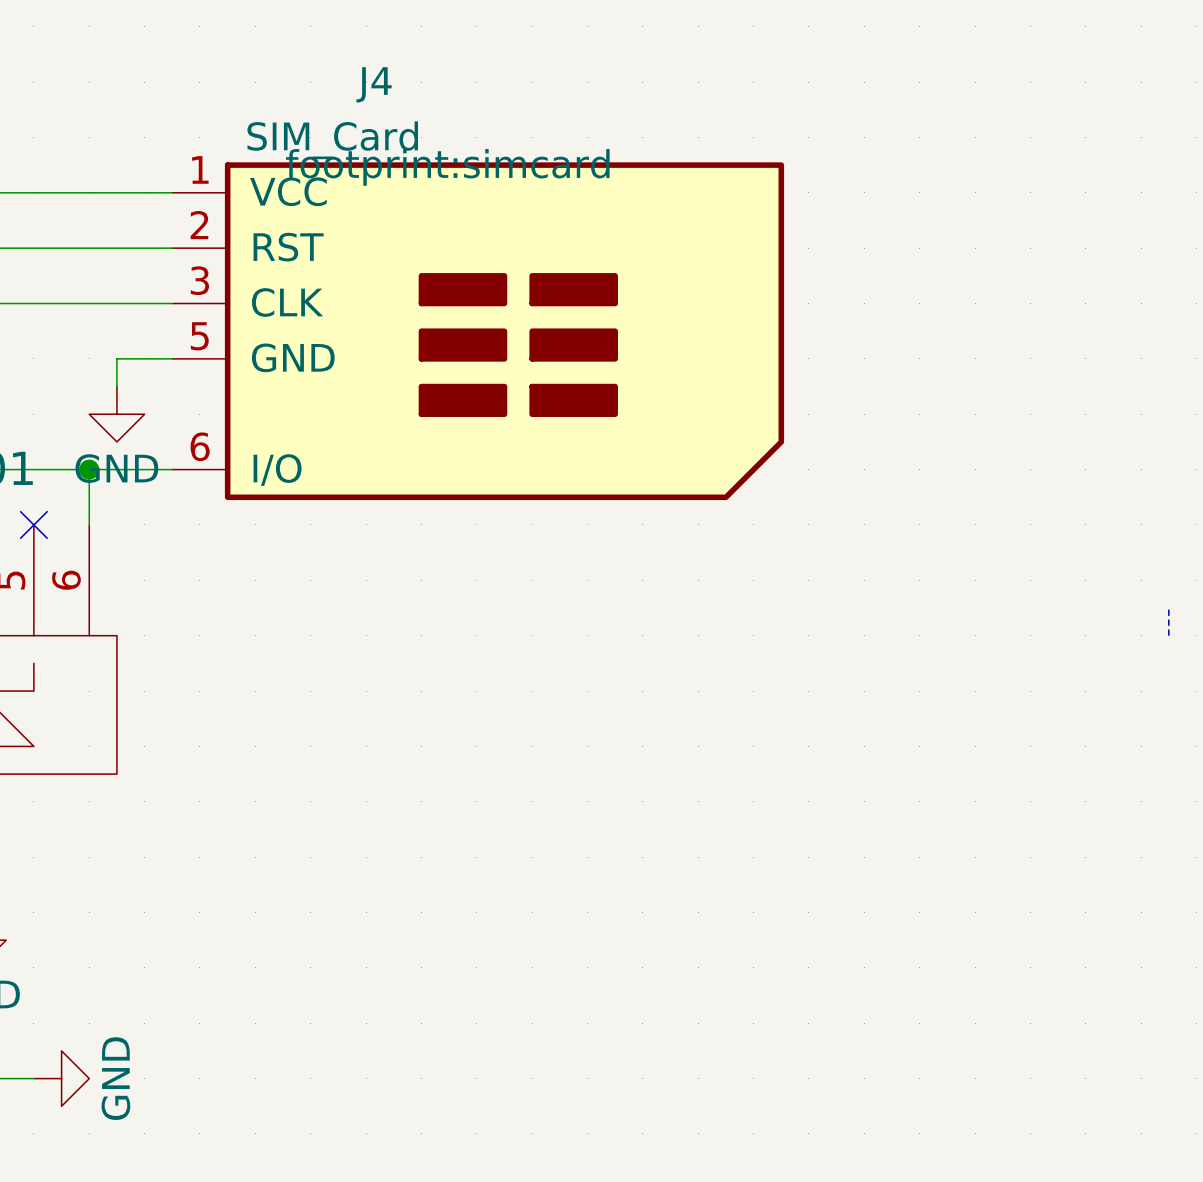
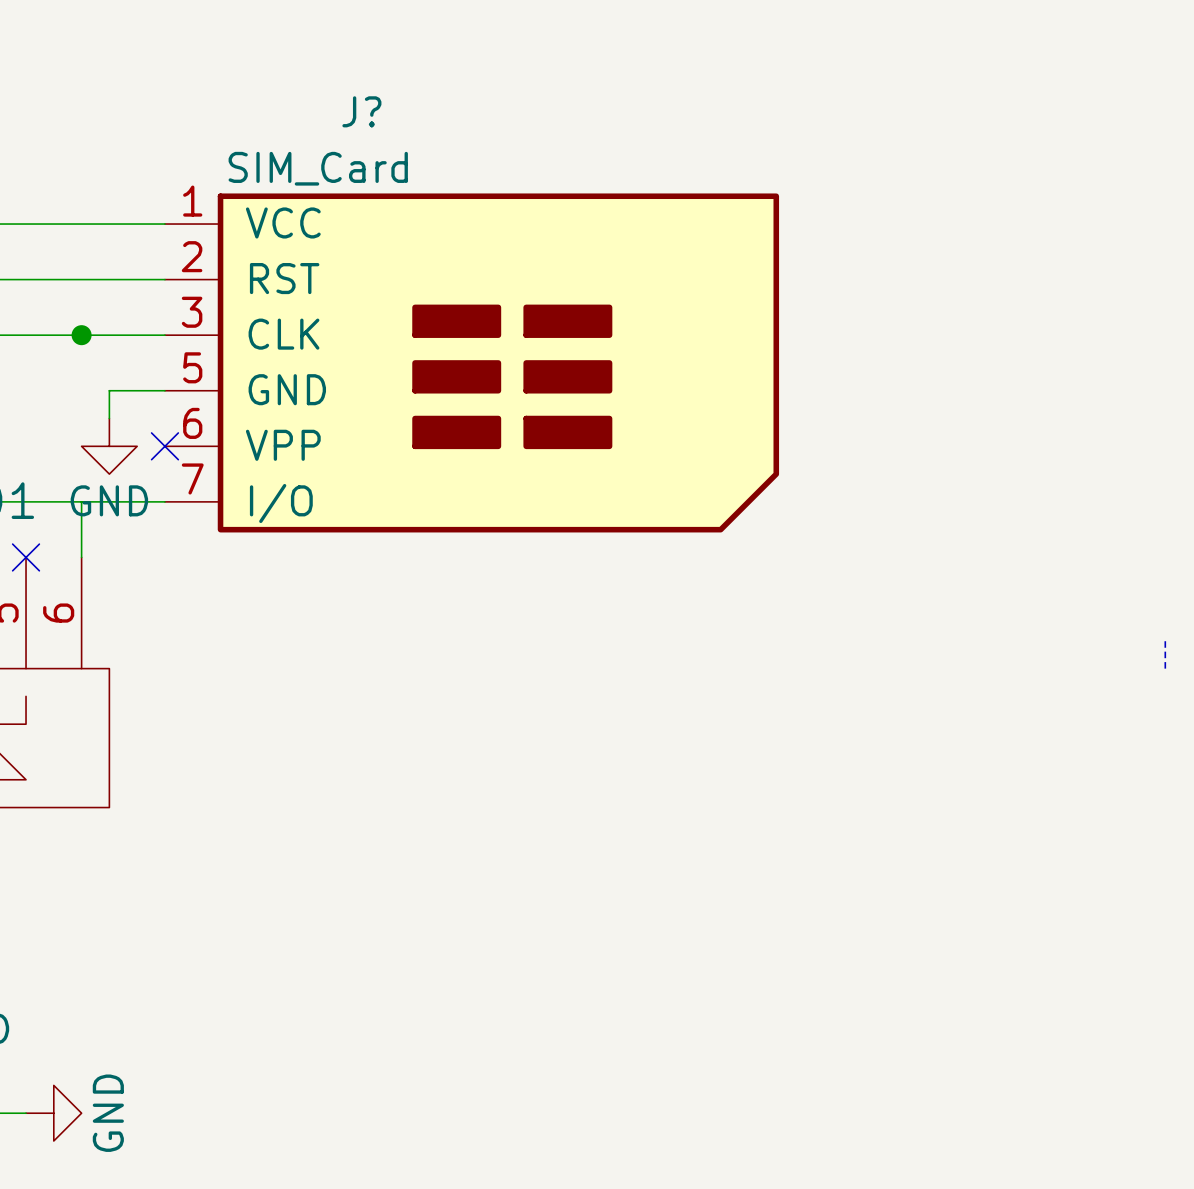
junction: none -> (81, 335)
J4: SIM_Card (478, 331) -> none
J?: none -> SIM_Card (472, 362)
no-connect mark: none -> (164, 446)
junction: (89, 469) -> none

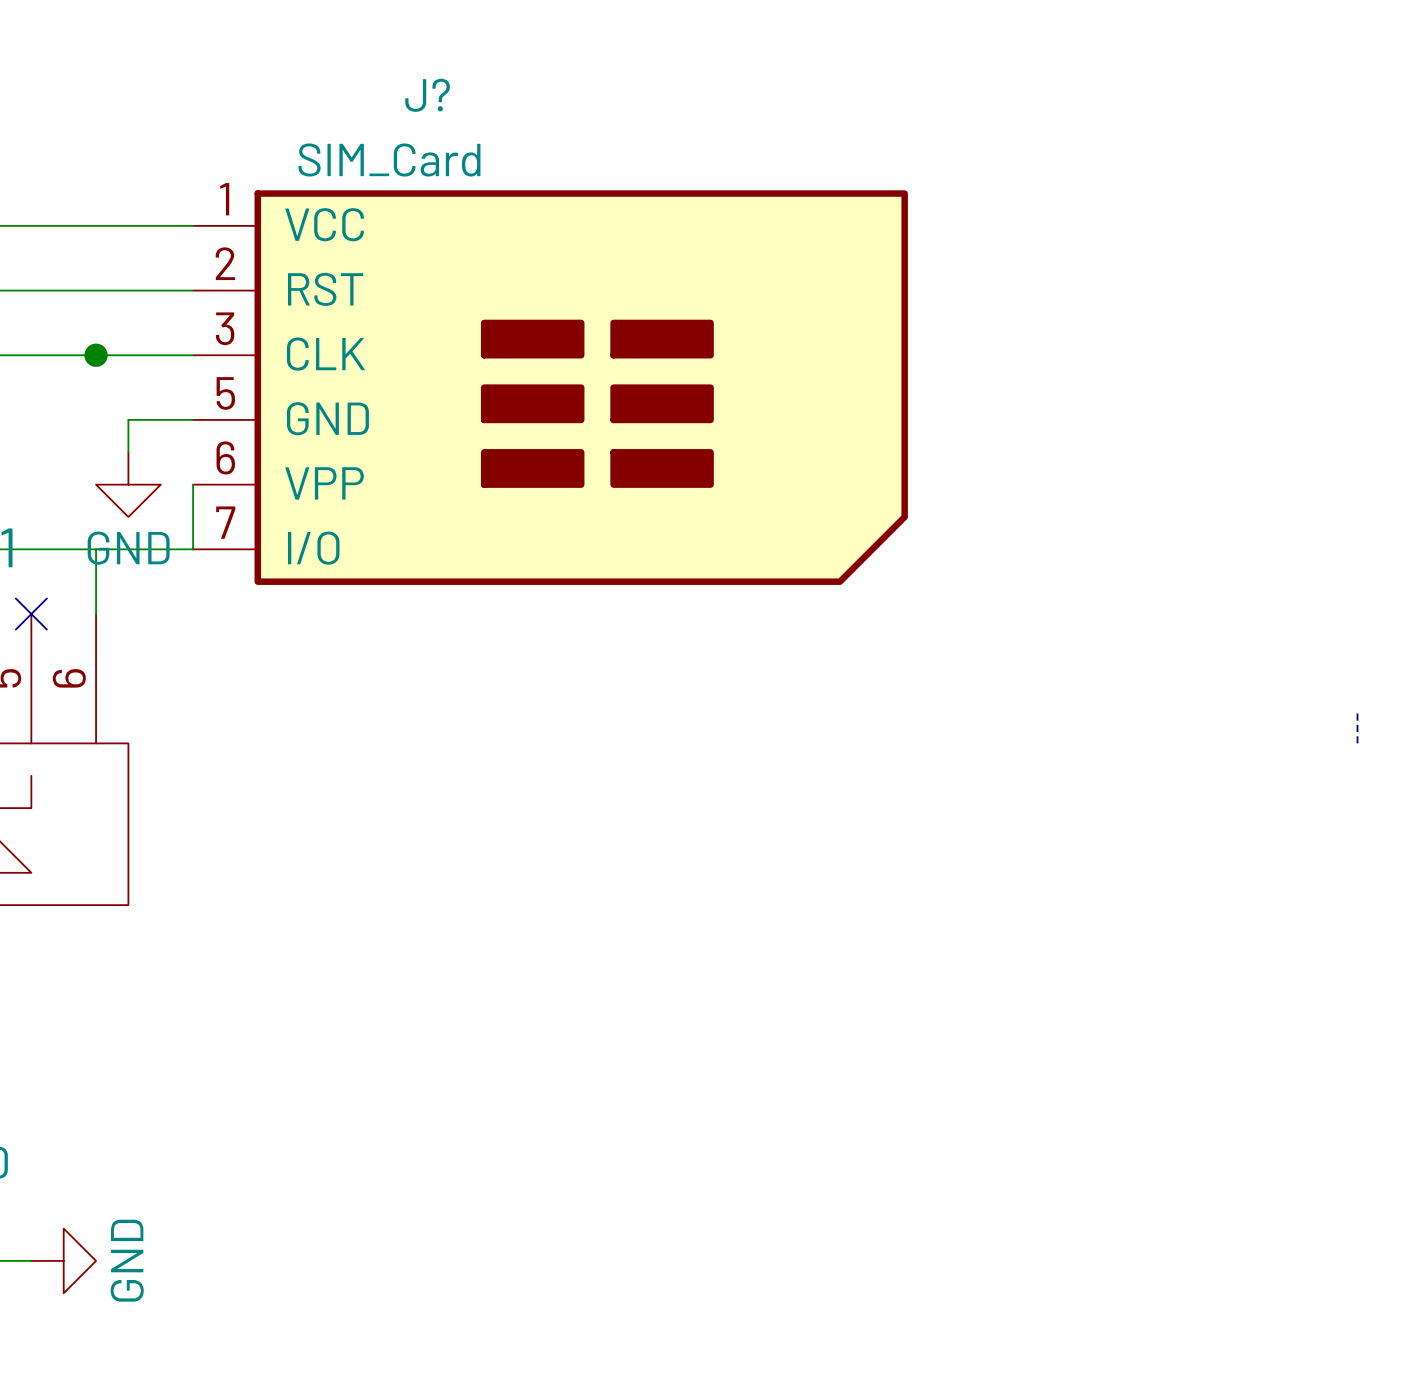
wire: none -> (193, 484) (193, 549)
no-connect mark: (164, 446) -> none

